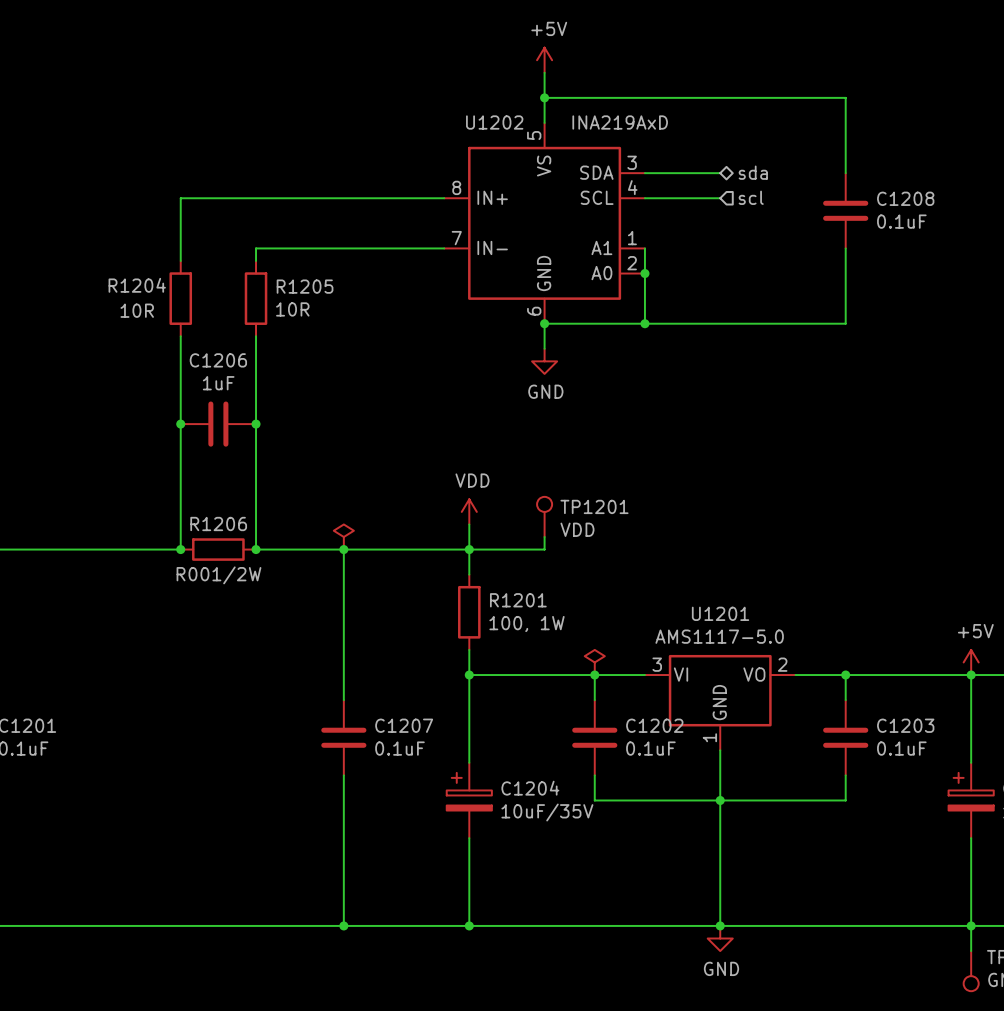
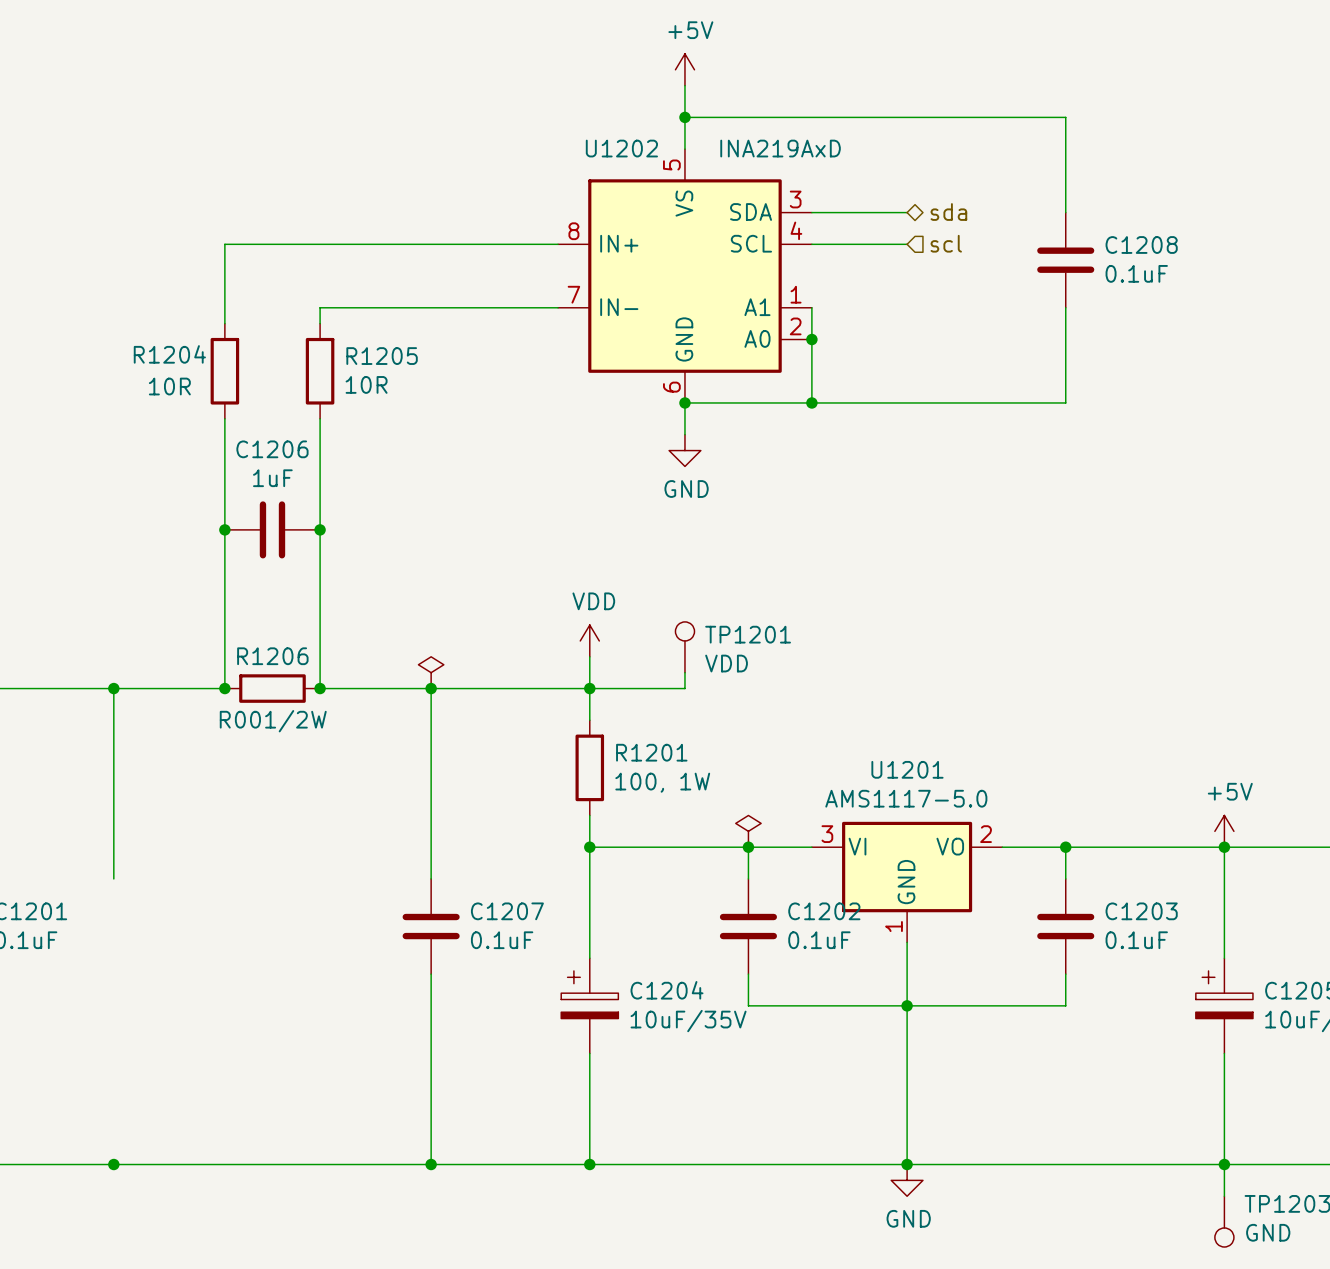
wire: none -> (113, 688) (113, 878)
junction: none -> (113, 688)
junction: none -> (113, 1164)

